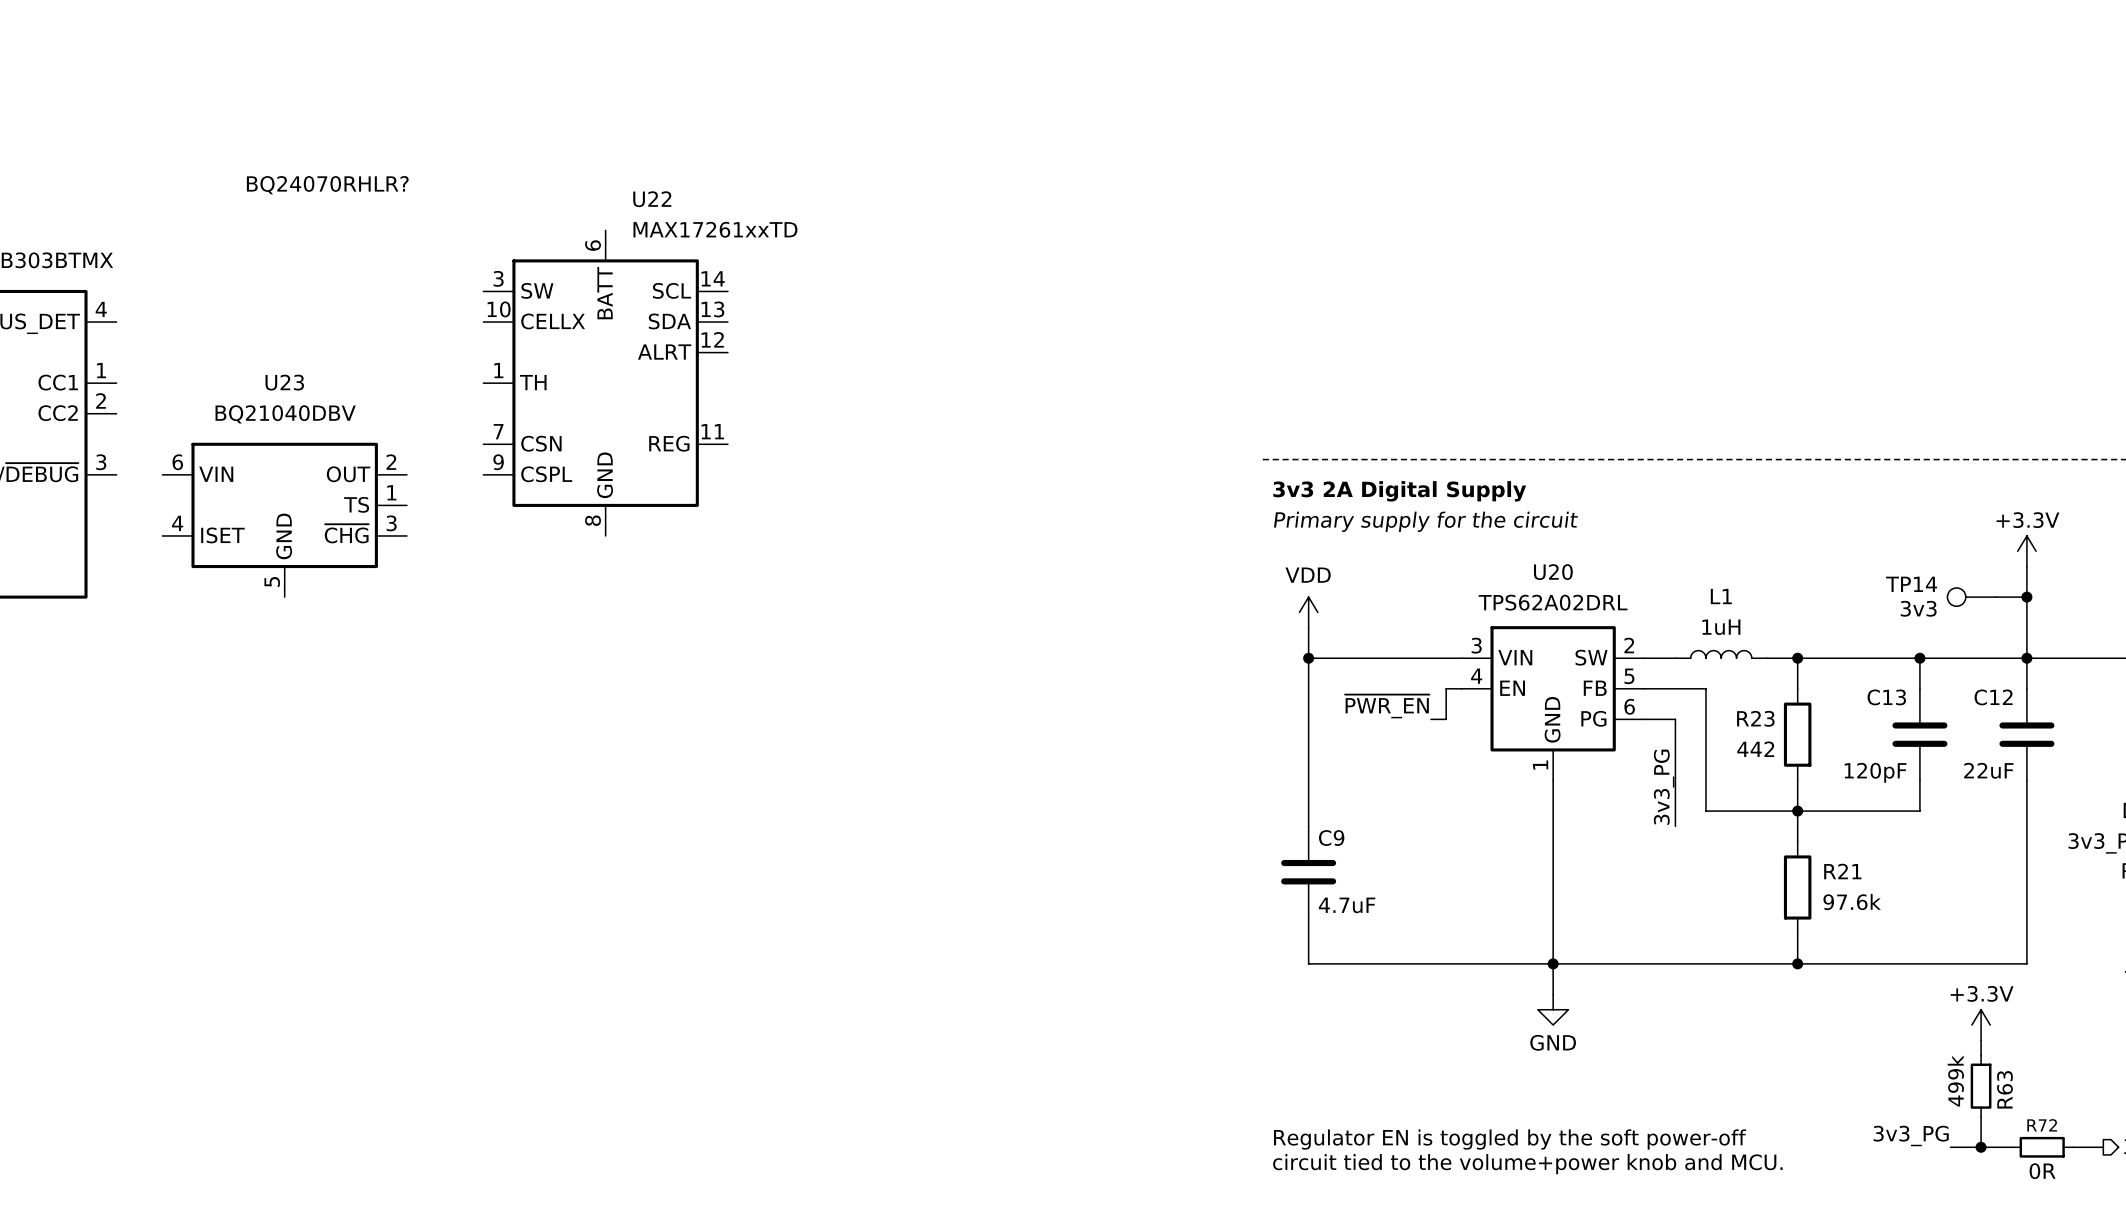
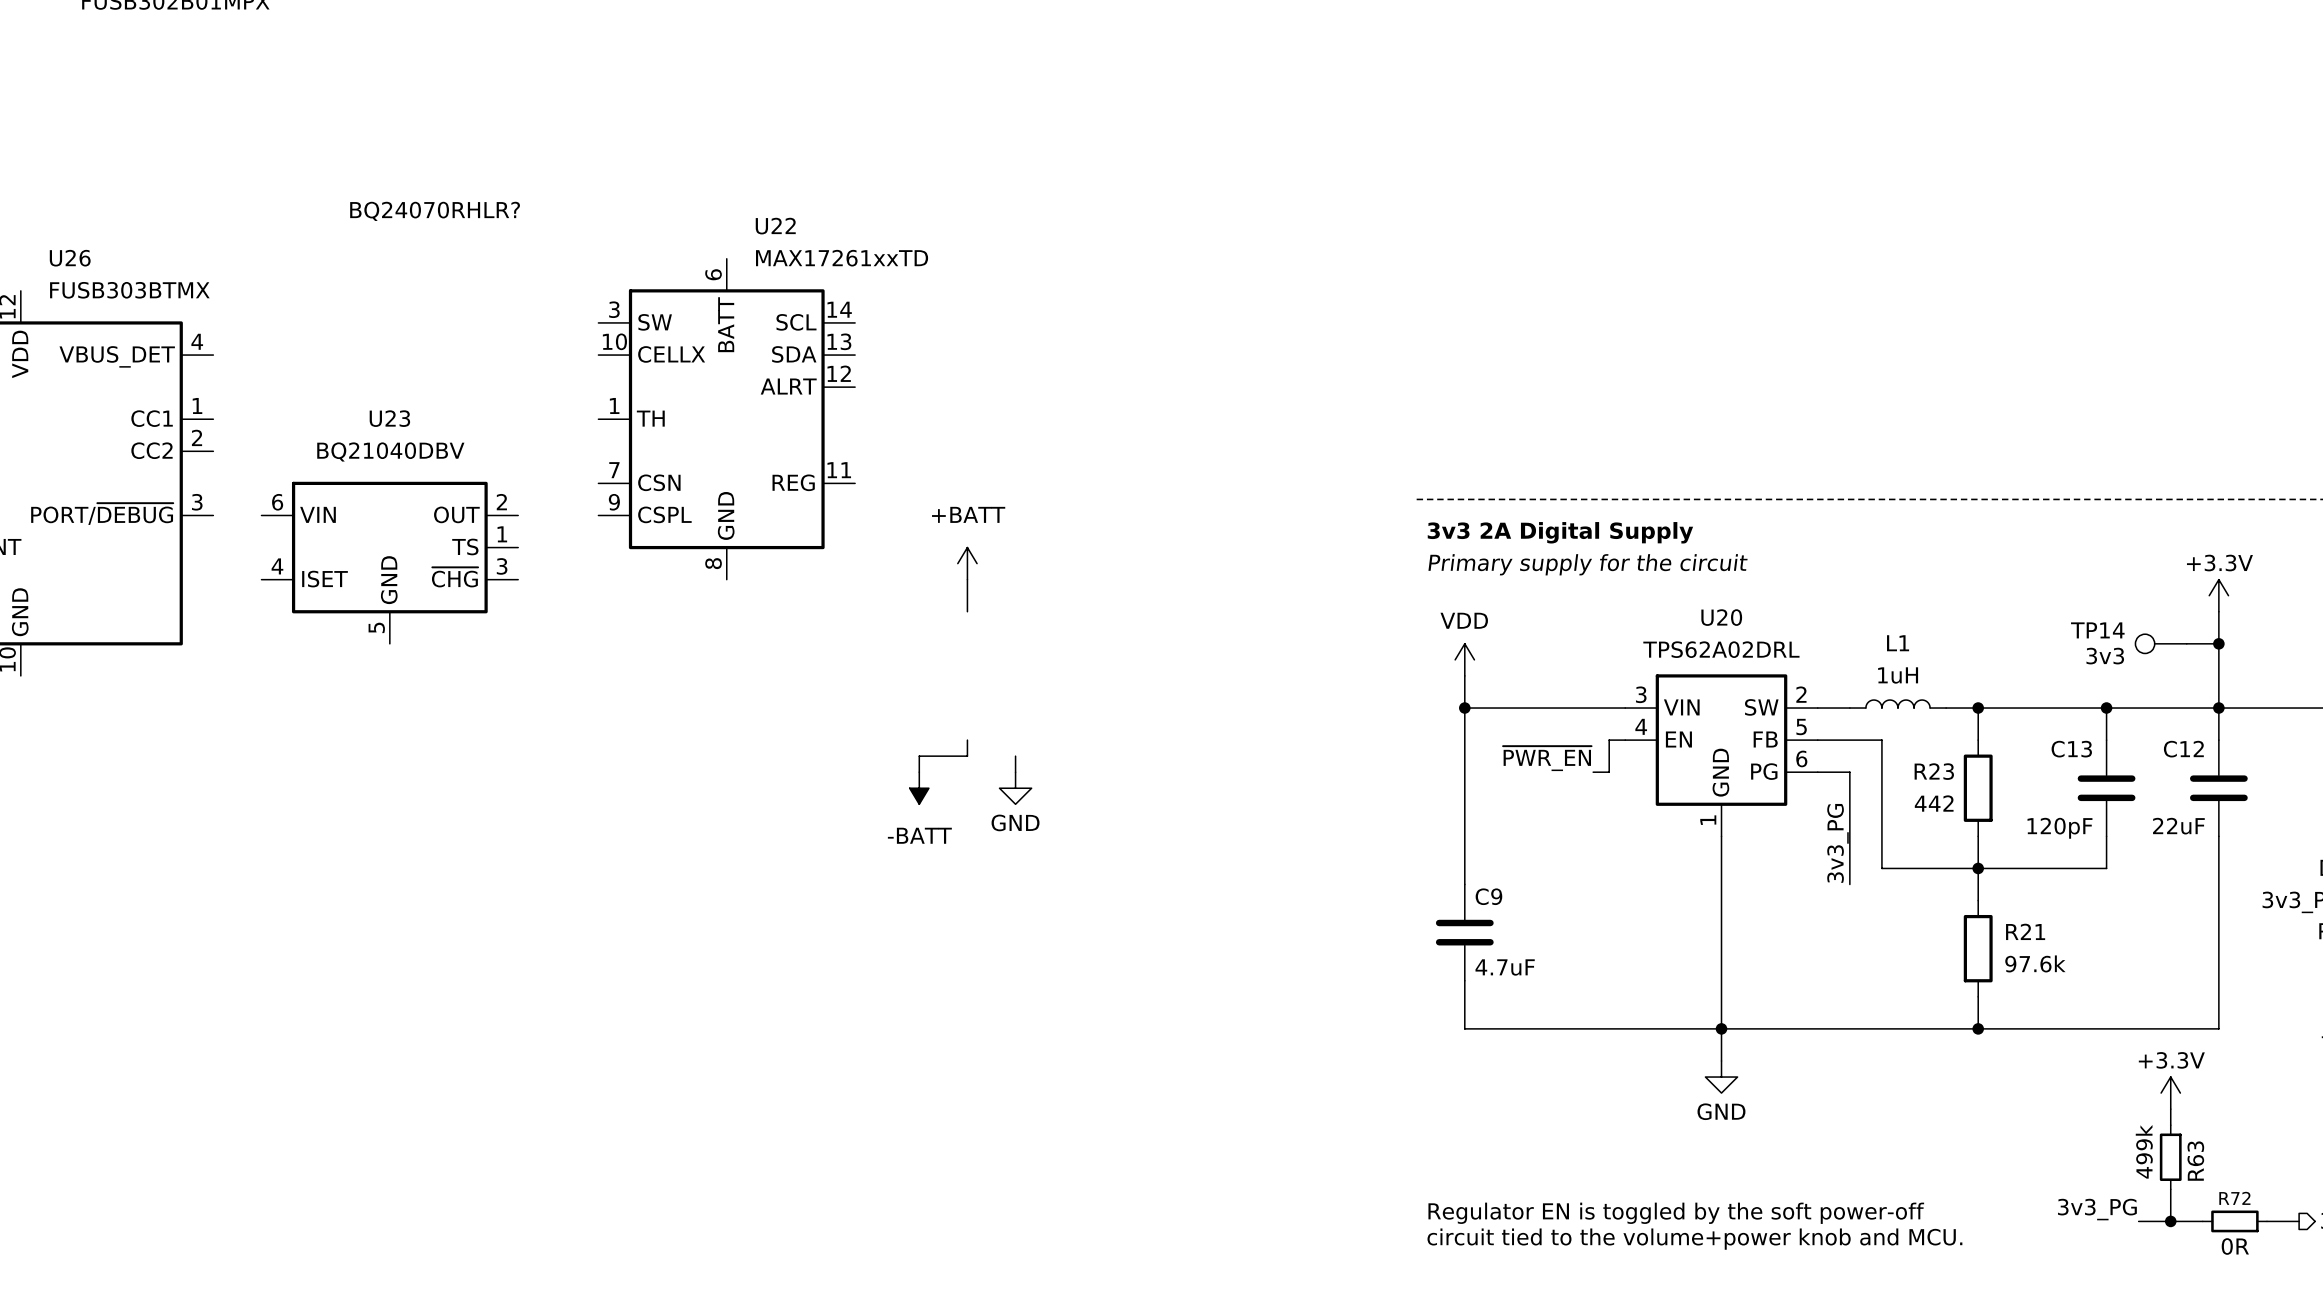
power symbol: none -> +BATT (967, 563)
wire: none -> (967, 579) (967, 611)
wire: none -> (967, 740) (967, 756) (919, 756) (919, 772)
wire: none -> (1015, 756) (1015, 772)
power symbol: none -> -BATT (919, 788)
power symbol: none -> GND (1015, 788)

